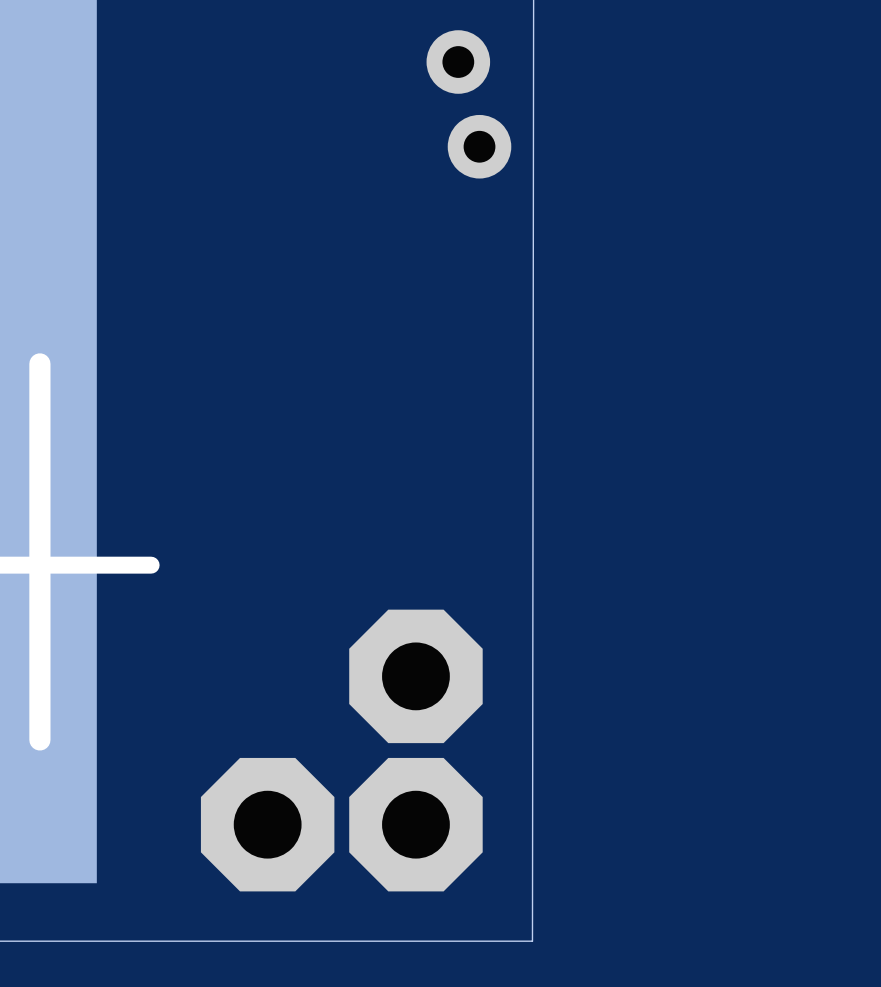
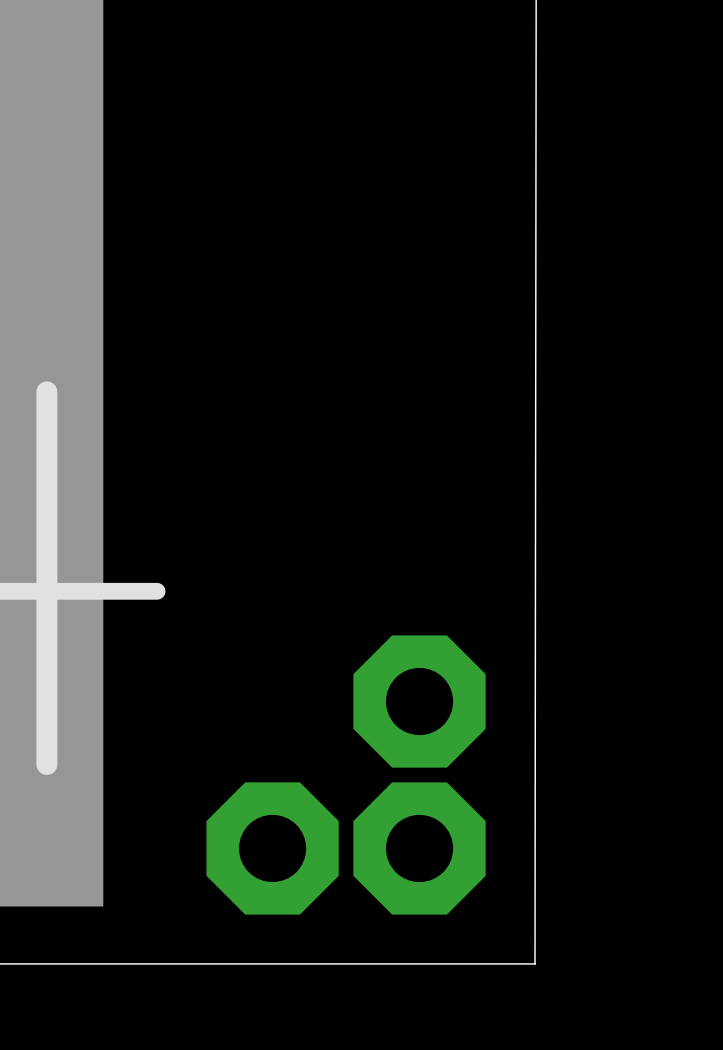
part: (458, 62) -> none
part: (479, 146) -> none

